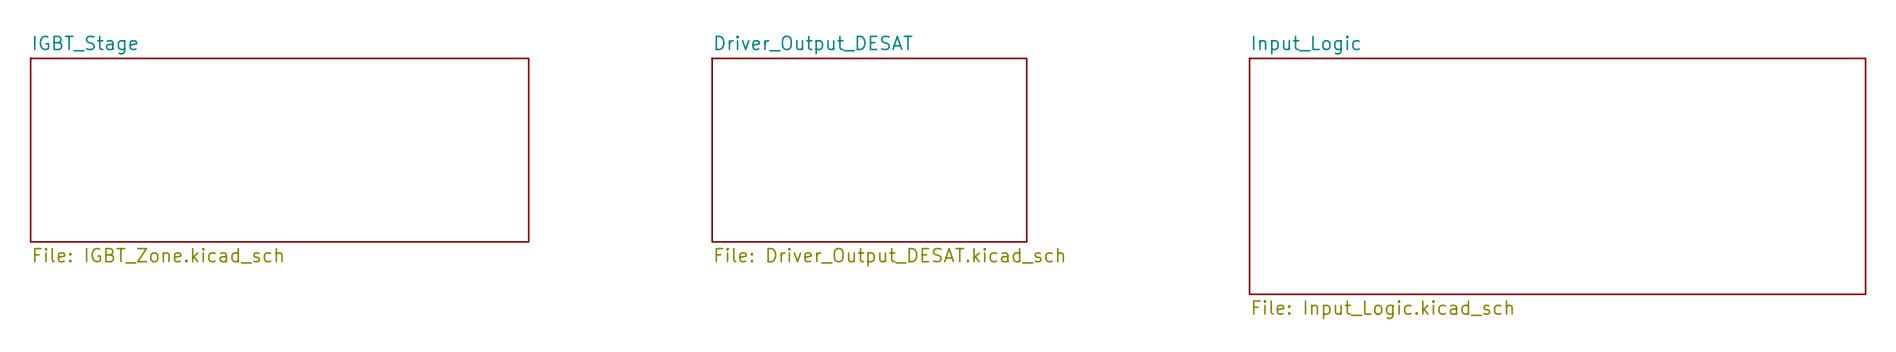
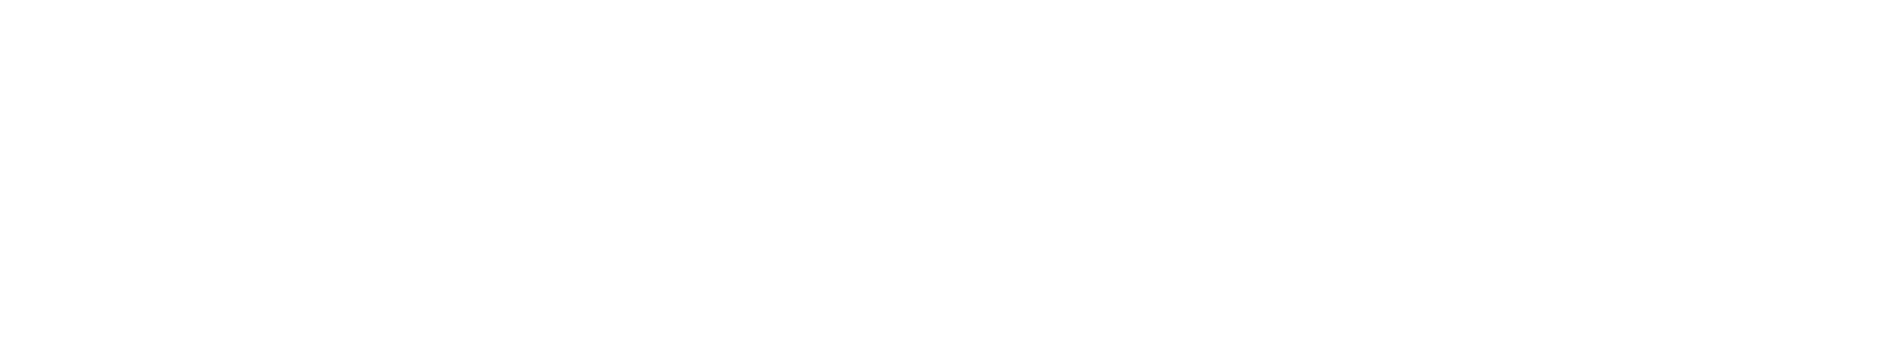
sheet IGBT_Stage: File: IGBT_Zone.kicad_sch (279, 150) -> none
sheet Driver_Output_DESAT: File: Driver_Output_DESAT.kicad_sch (869, 150) -> none
sheet Input_Logic: File: Input_Logic.kicad_sch (1557, 176) -> none

